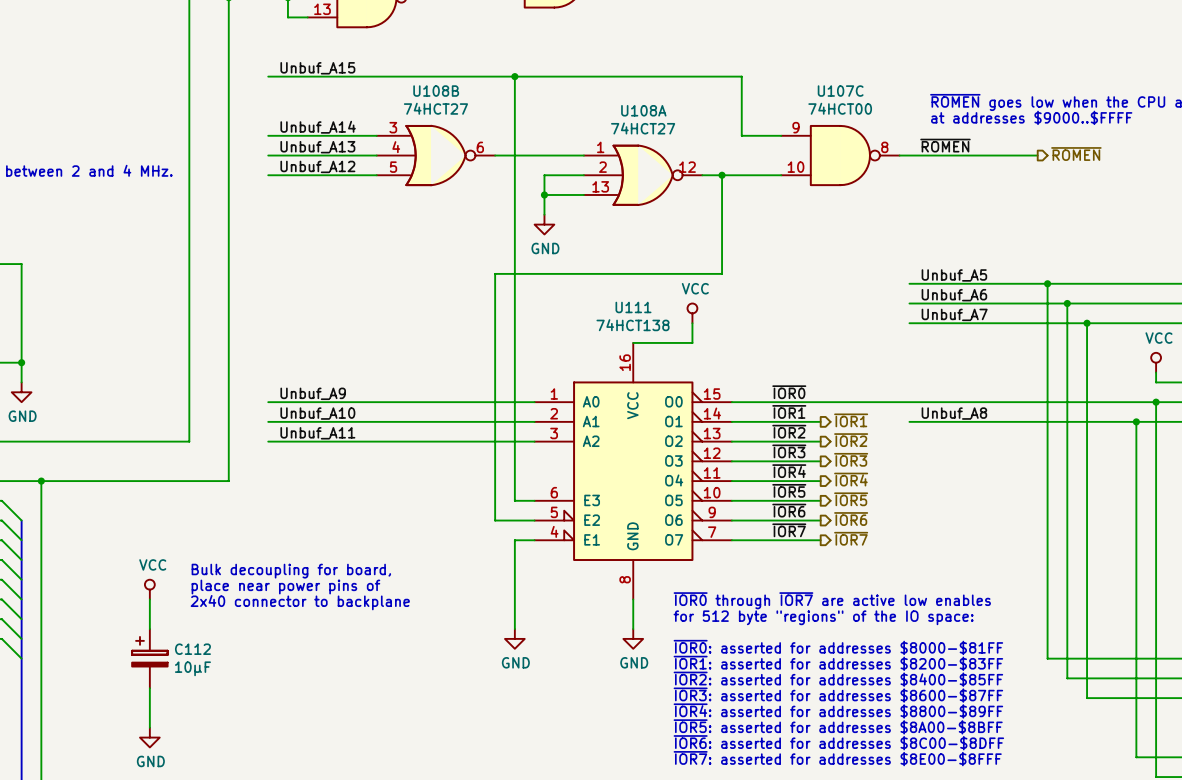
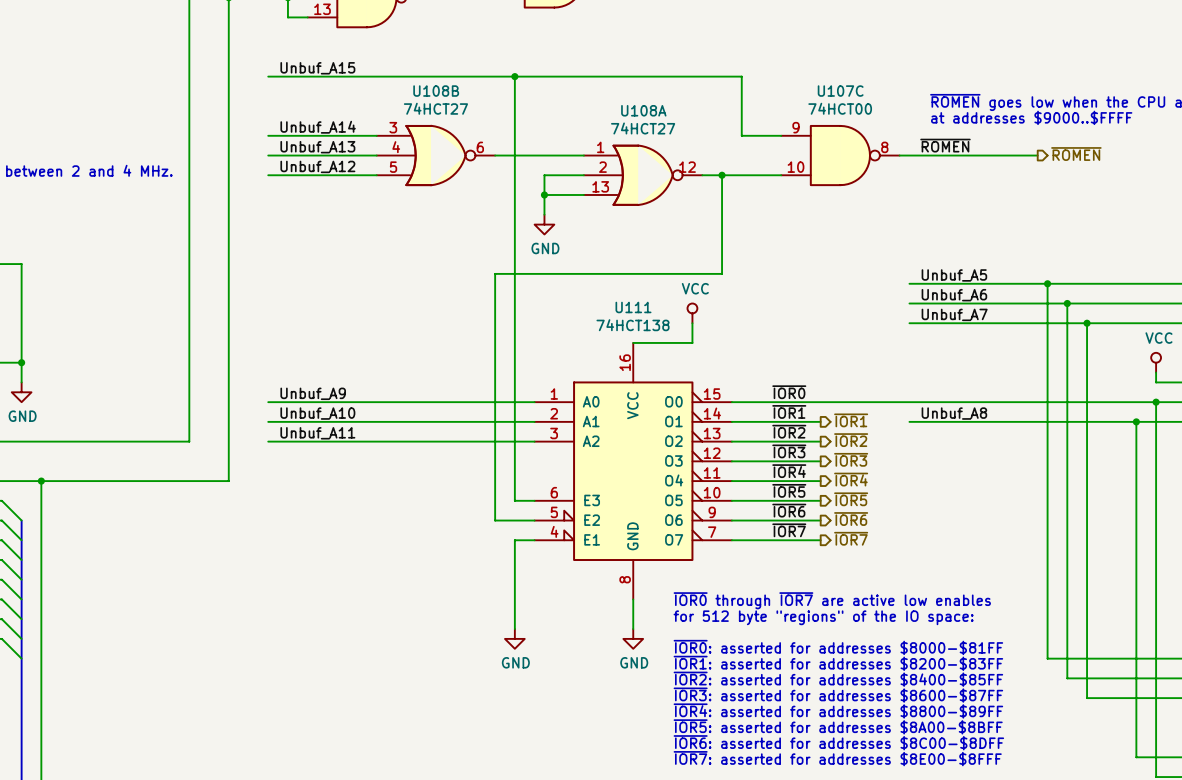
text: Bulk decoupling for board, (291, 571) -> none
text: place near power pins of (285, 587) -> none
power symbol: VCC (149, 589) -> none
wire: (149, 599) (149, 629) -> none
text: 2x40 connector to backplane (300, 602) -> none
C112: 10μF (149, 658) -> none
wire: (149, 688) (149, 727) -> none
power symbol: GND (149, 737) -> none

